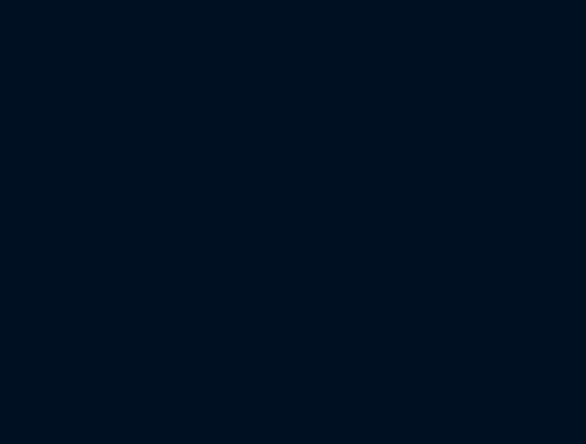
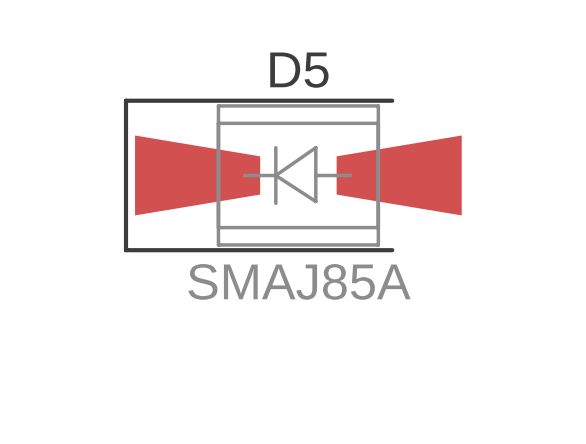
D5: none -> SMAJ85A (292, 175)

